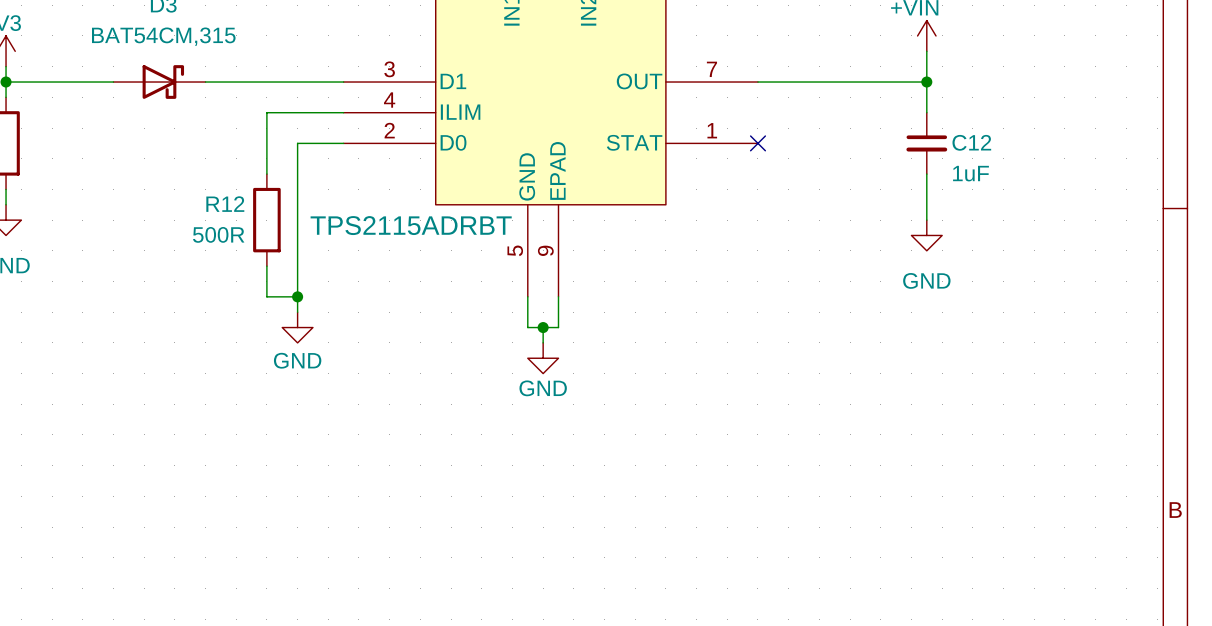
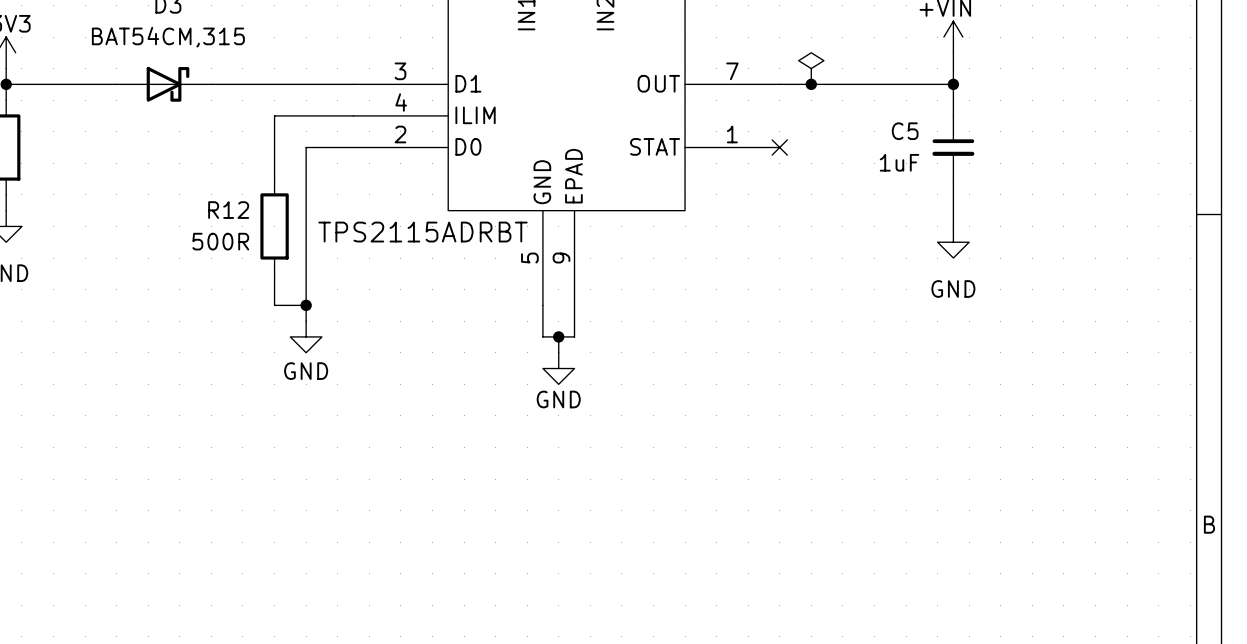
power symbol: none -> (811, 68)
junction: none -> (811, 84)
C12 name: C12 (971, 142) -> C5 (905, 131)
C12 value position: 1uF (970, 173) -> 1uF (899, 162)

